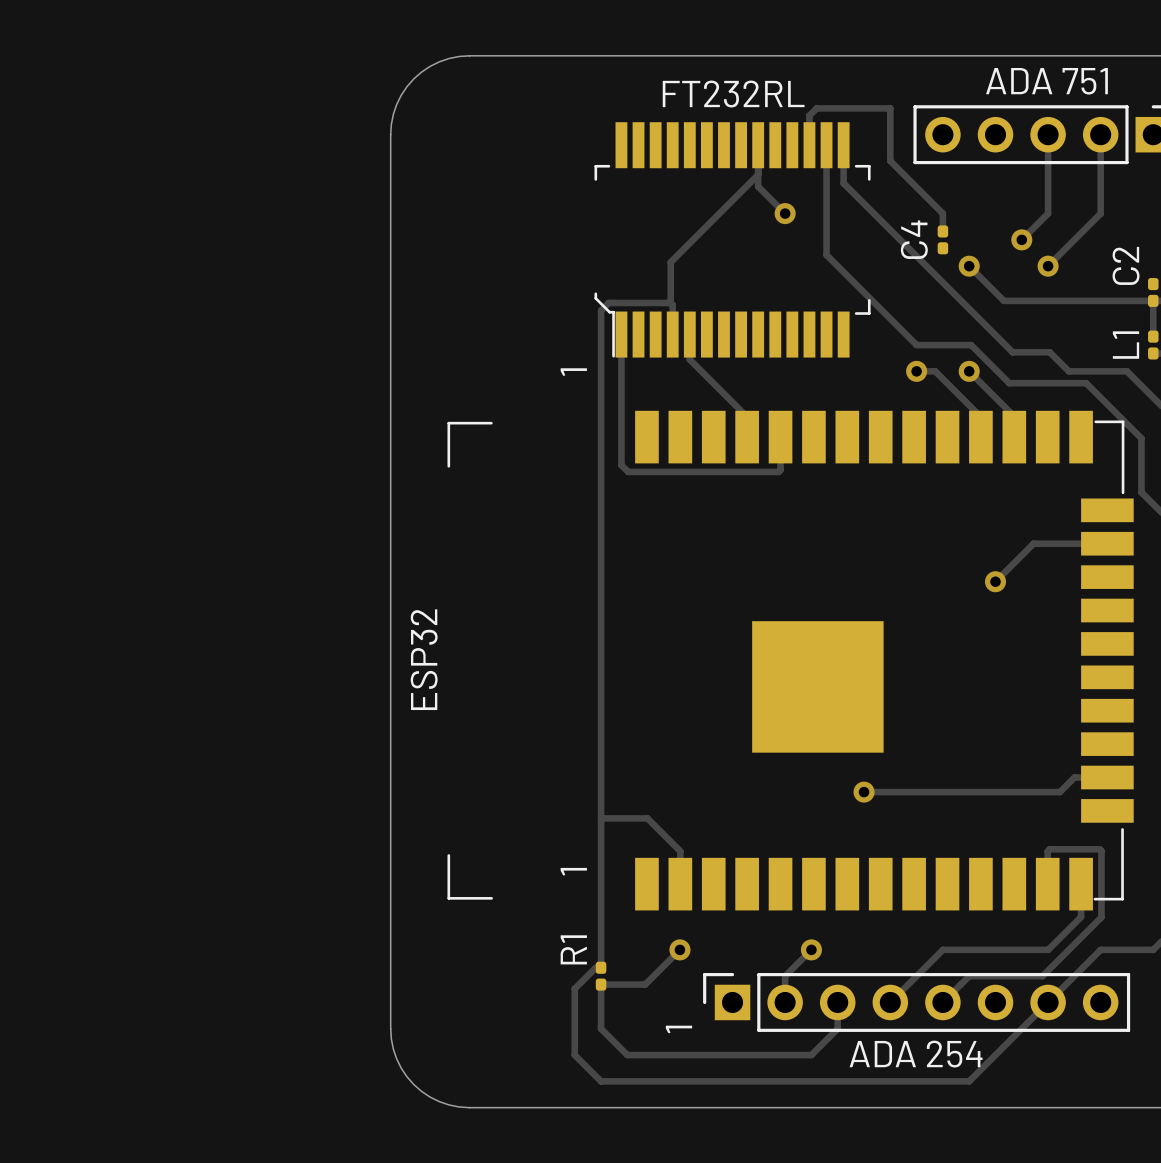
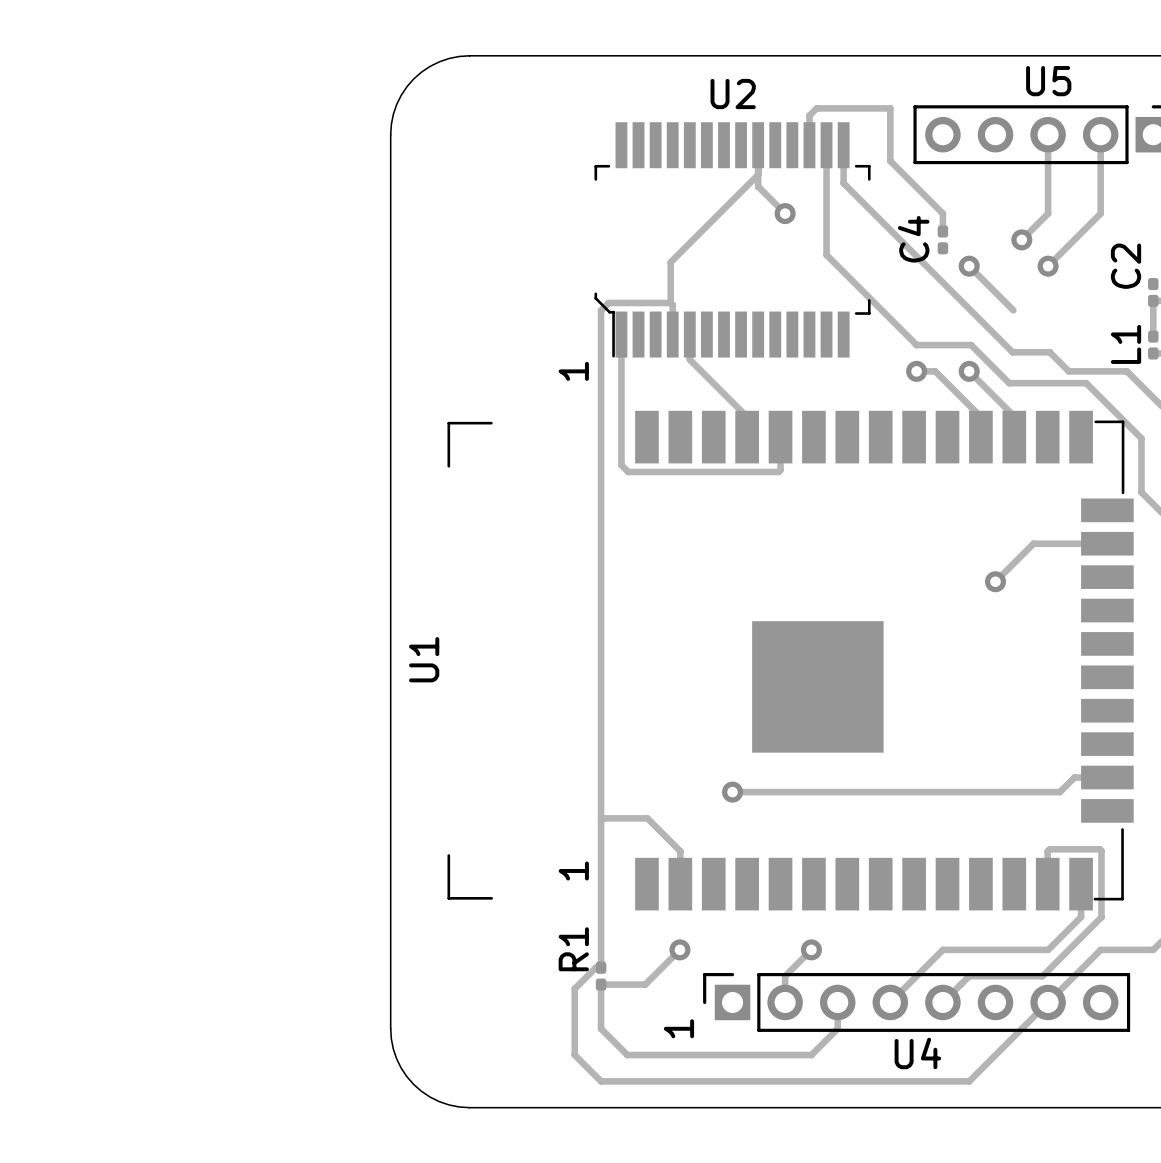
ADA 751 name: ADA 751 (1046, 81) -> U5 (1048, 81)
FT232RL name: FT232RL (733, 94) -> U2 (733, 94)
track: (1003, 300) (1153, 300) -> (1003, 300) (1013, 310)
ESP32 name: ESP32 (424, 659) -> U1 (424, 659)
track: none -> (732, 792) (864, 792)
via position: (864, 792) -> (732, 792)
ADA 254 name: ADA 254 (916, 1054) -> U4 (917, 1053)

